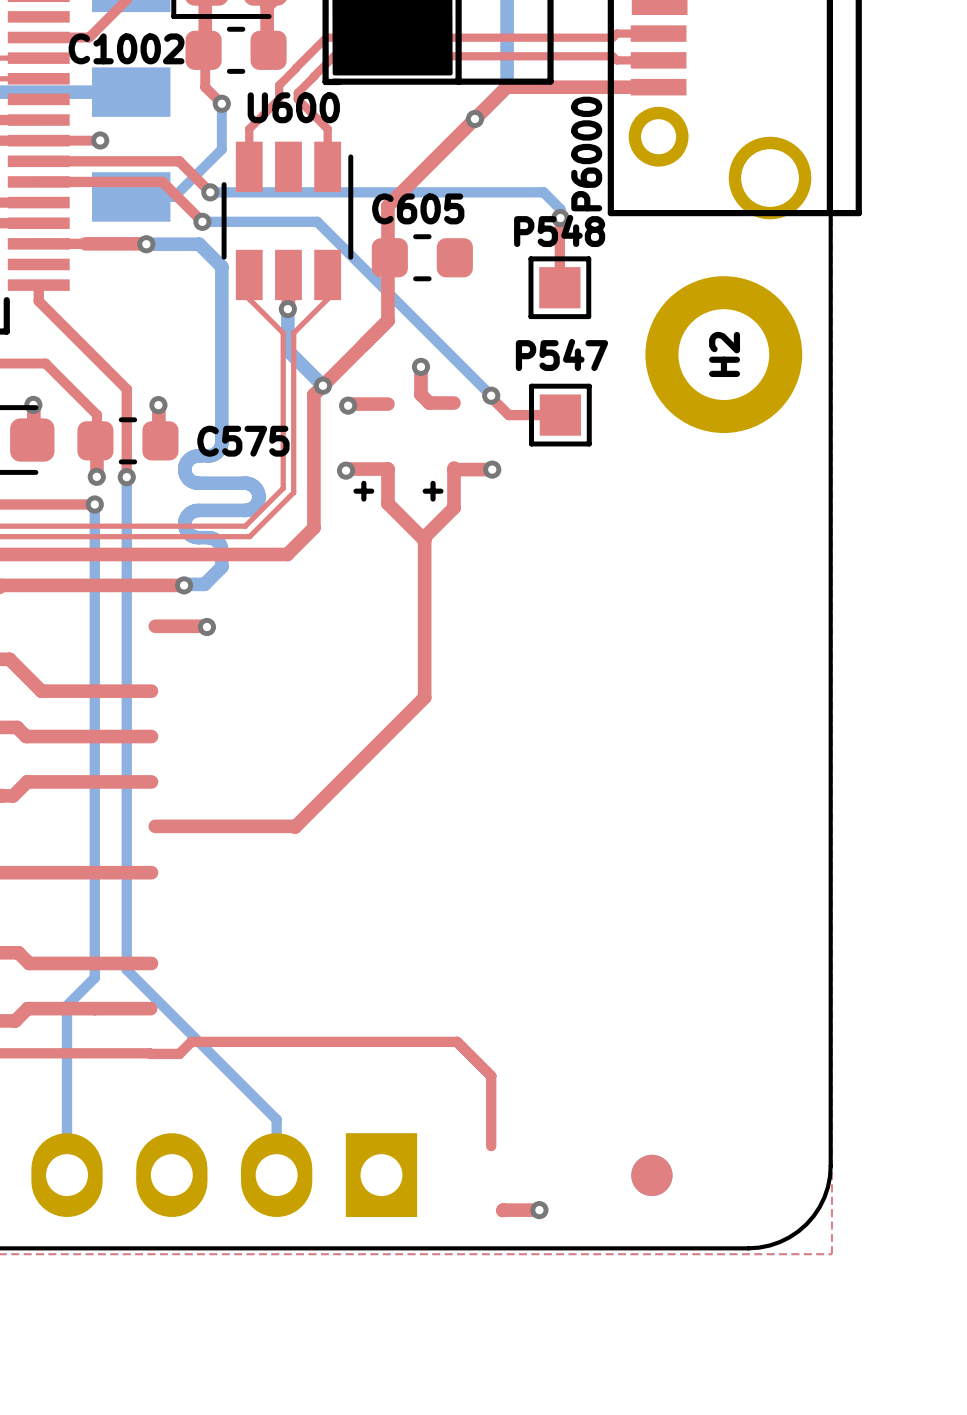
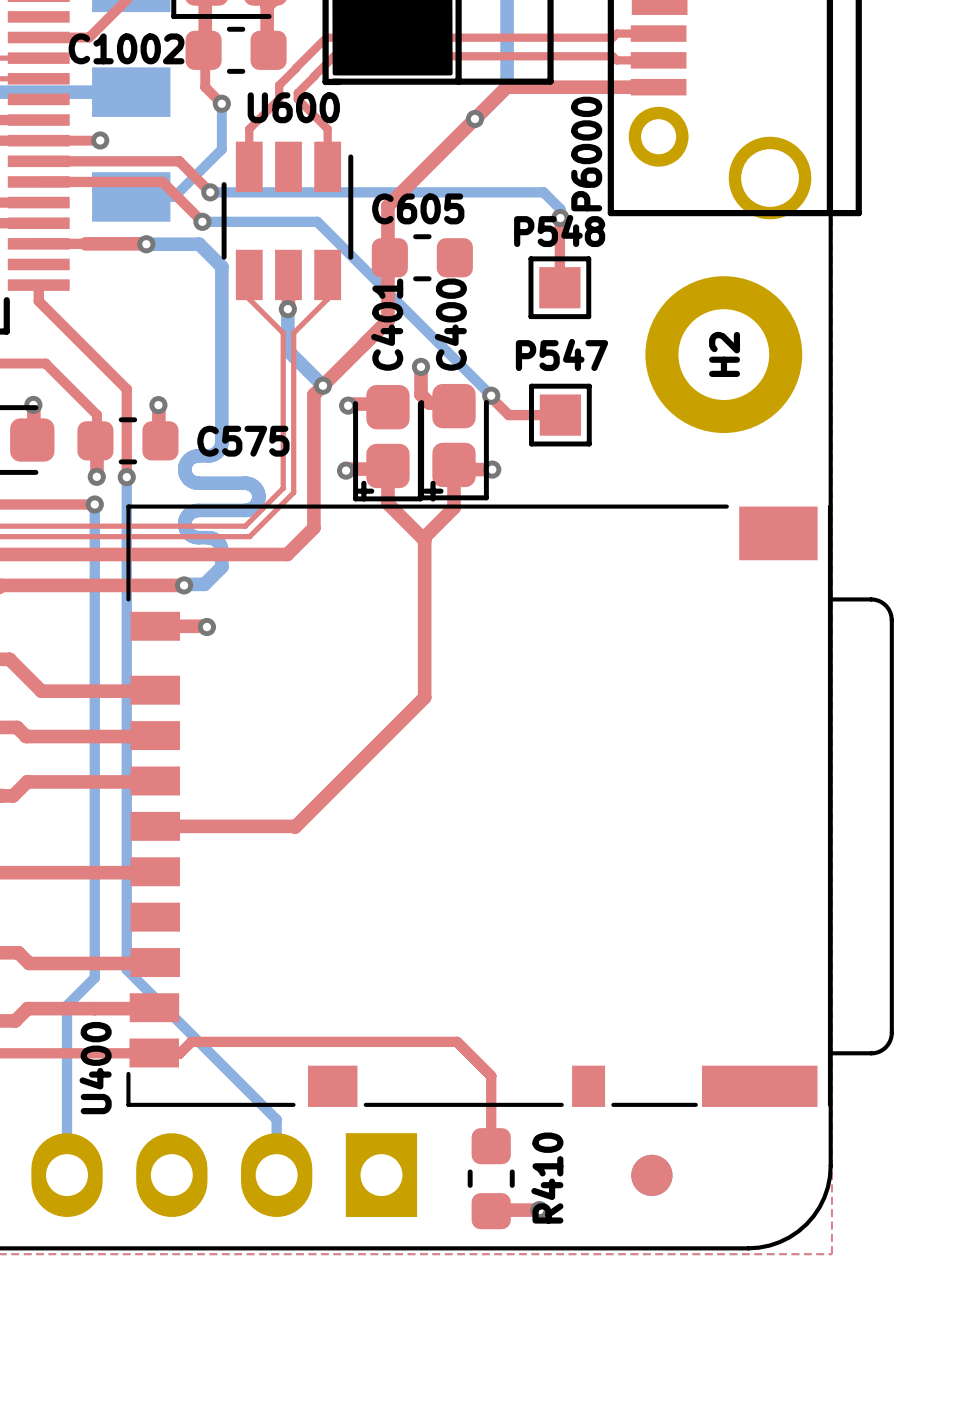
C400: none -> (454, 442)
C401: none -> (387, 443)
U400: none -> (510, 805)
R410: none -> (491, 1178)

